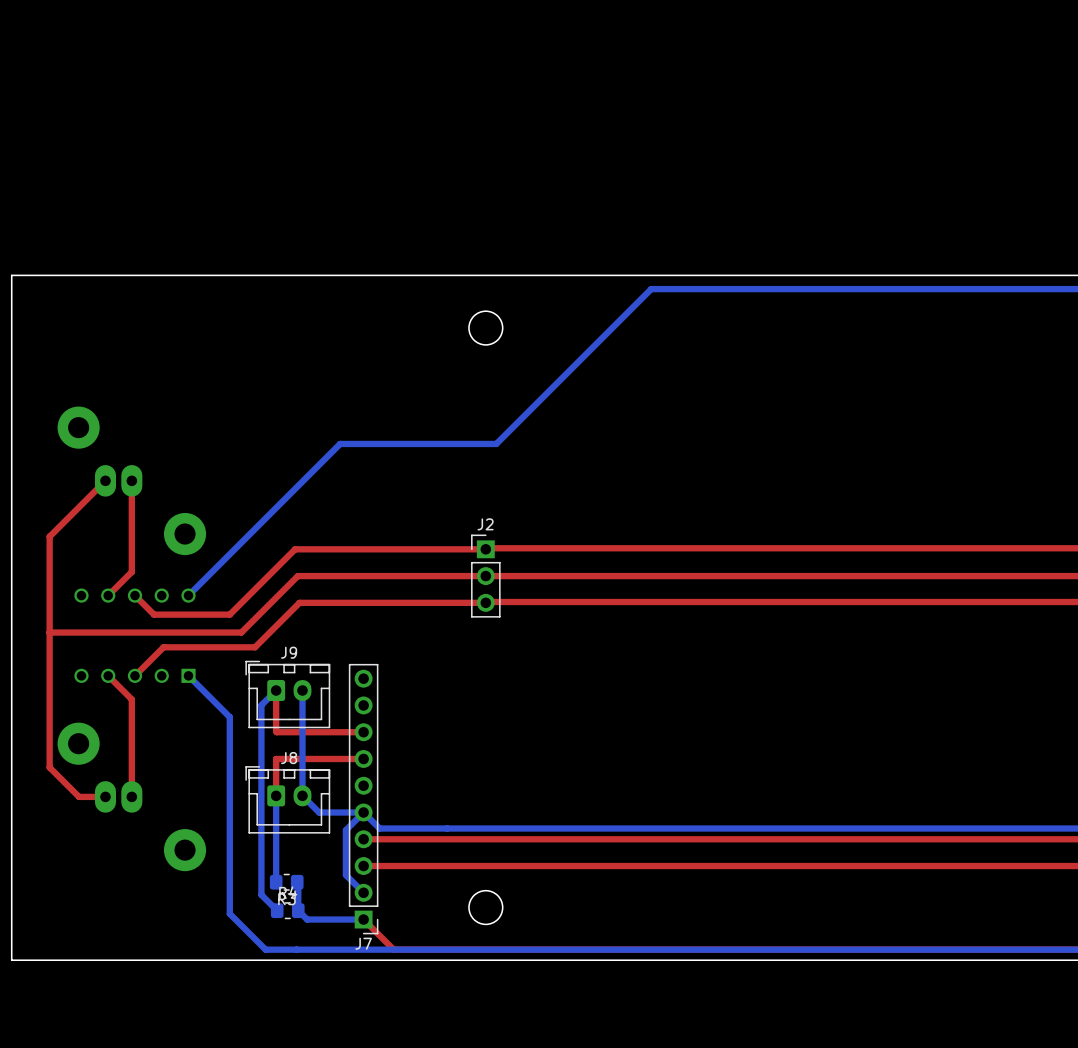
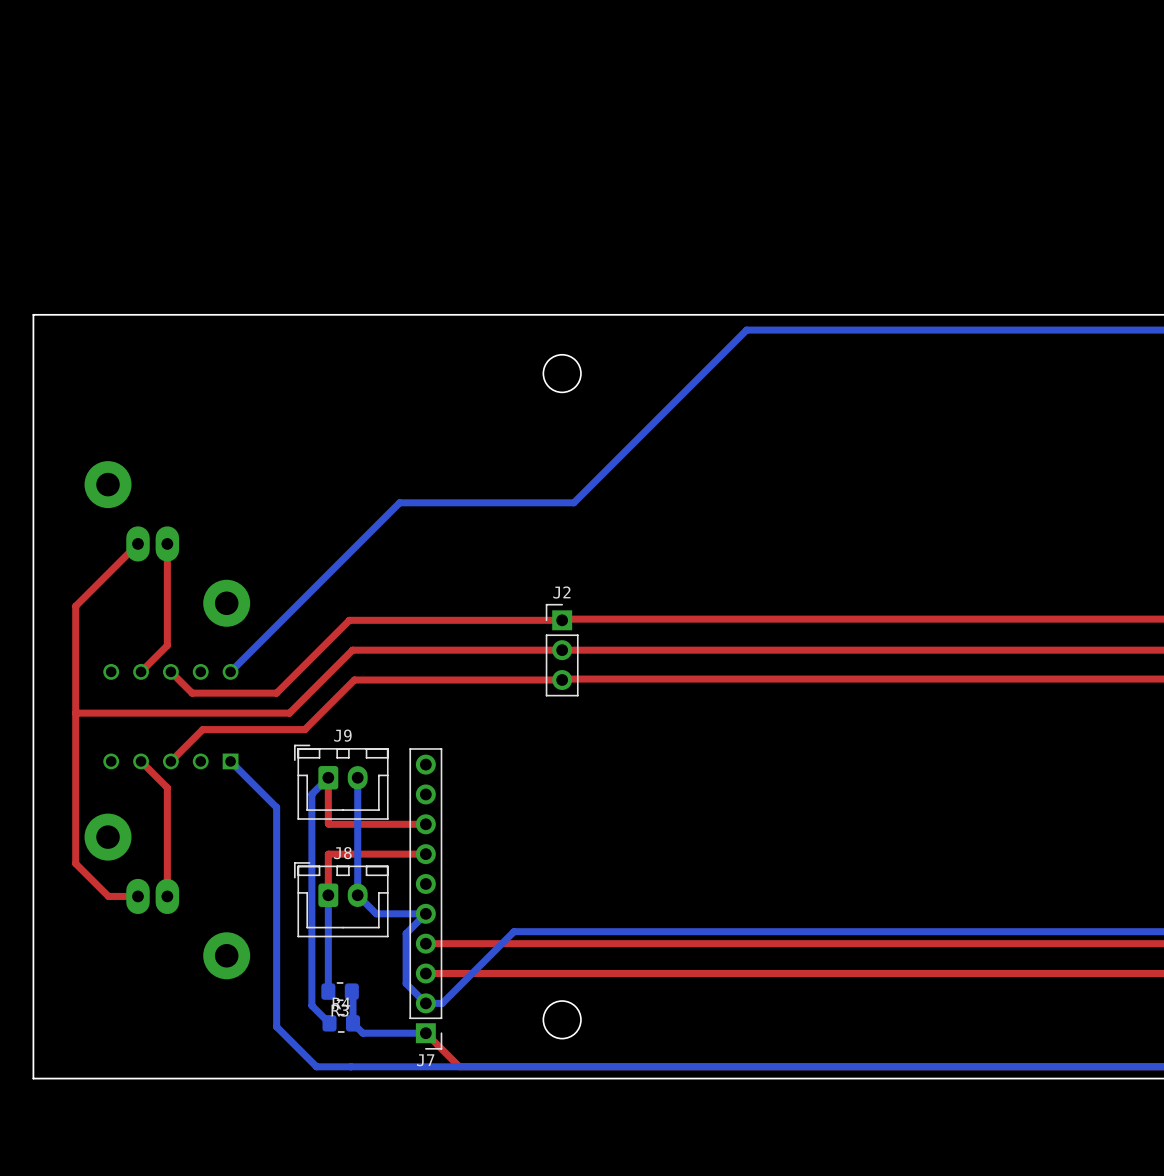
bottom track: (363, 812) (379, 828) (442, 828) -> (425, 1003) (442, 1003) (513, 931)

